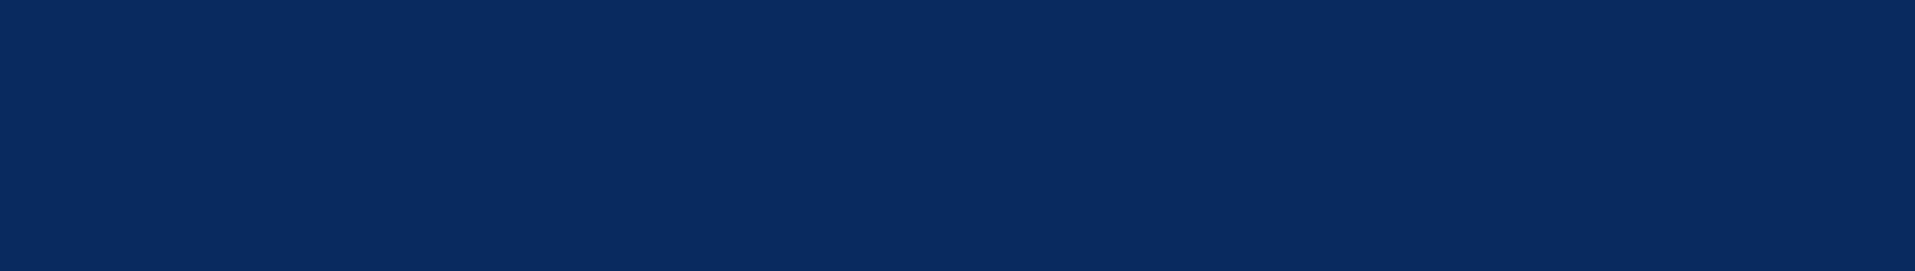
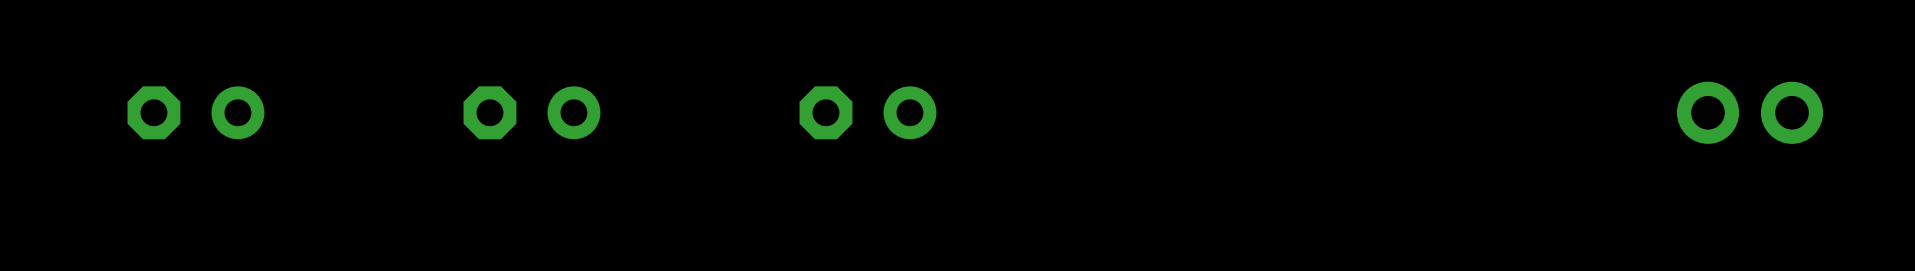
part: none -> (195, 112)
part: none -> (531, 112)
part: none -> (867, 112)
part: none -> (1750, 112)

